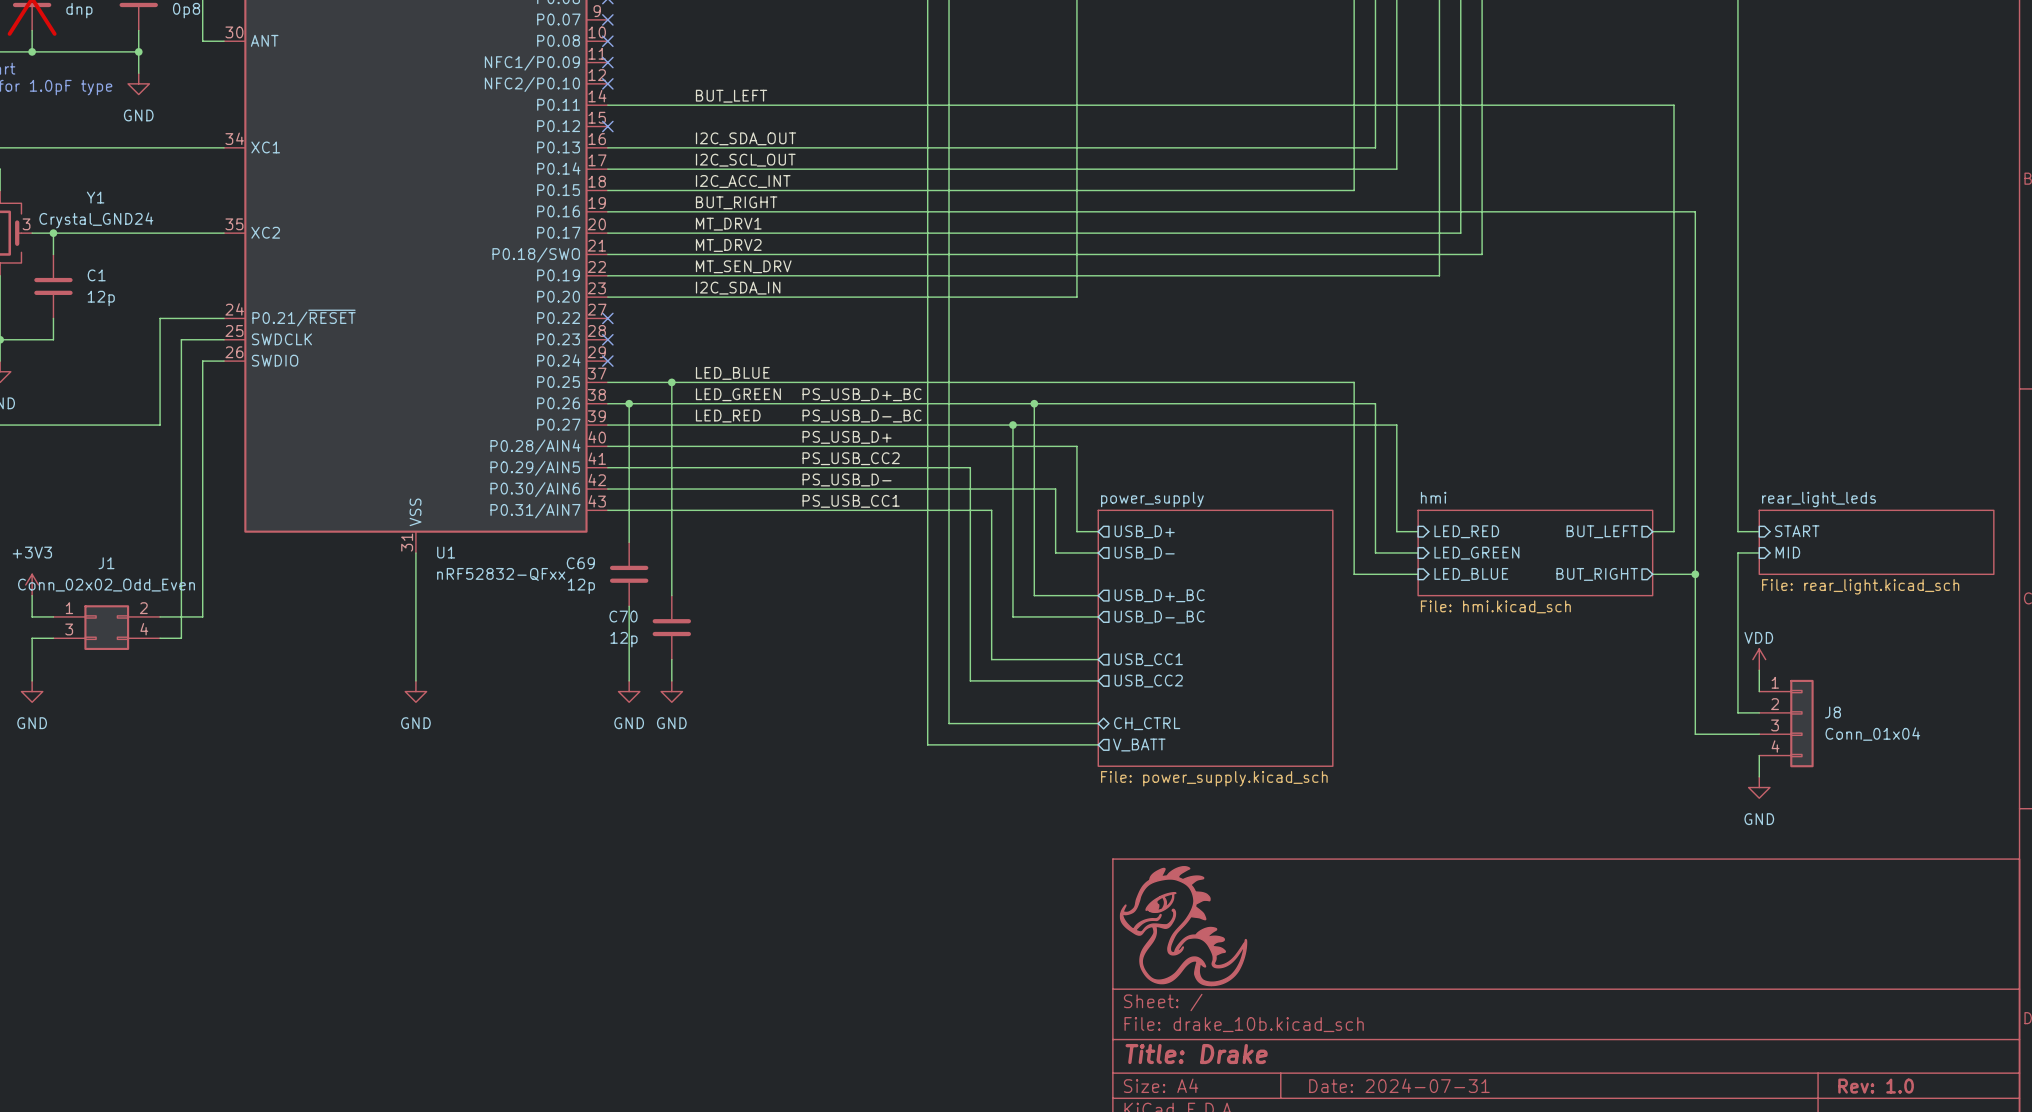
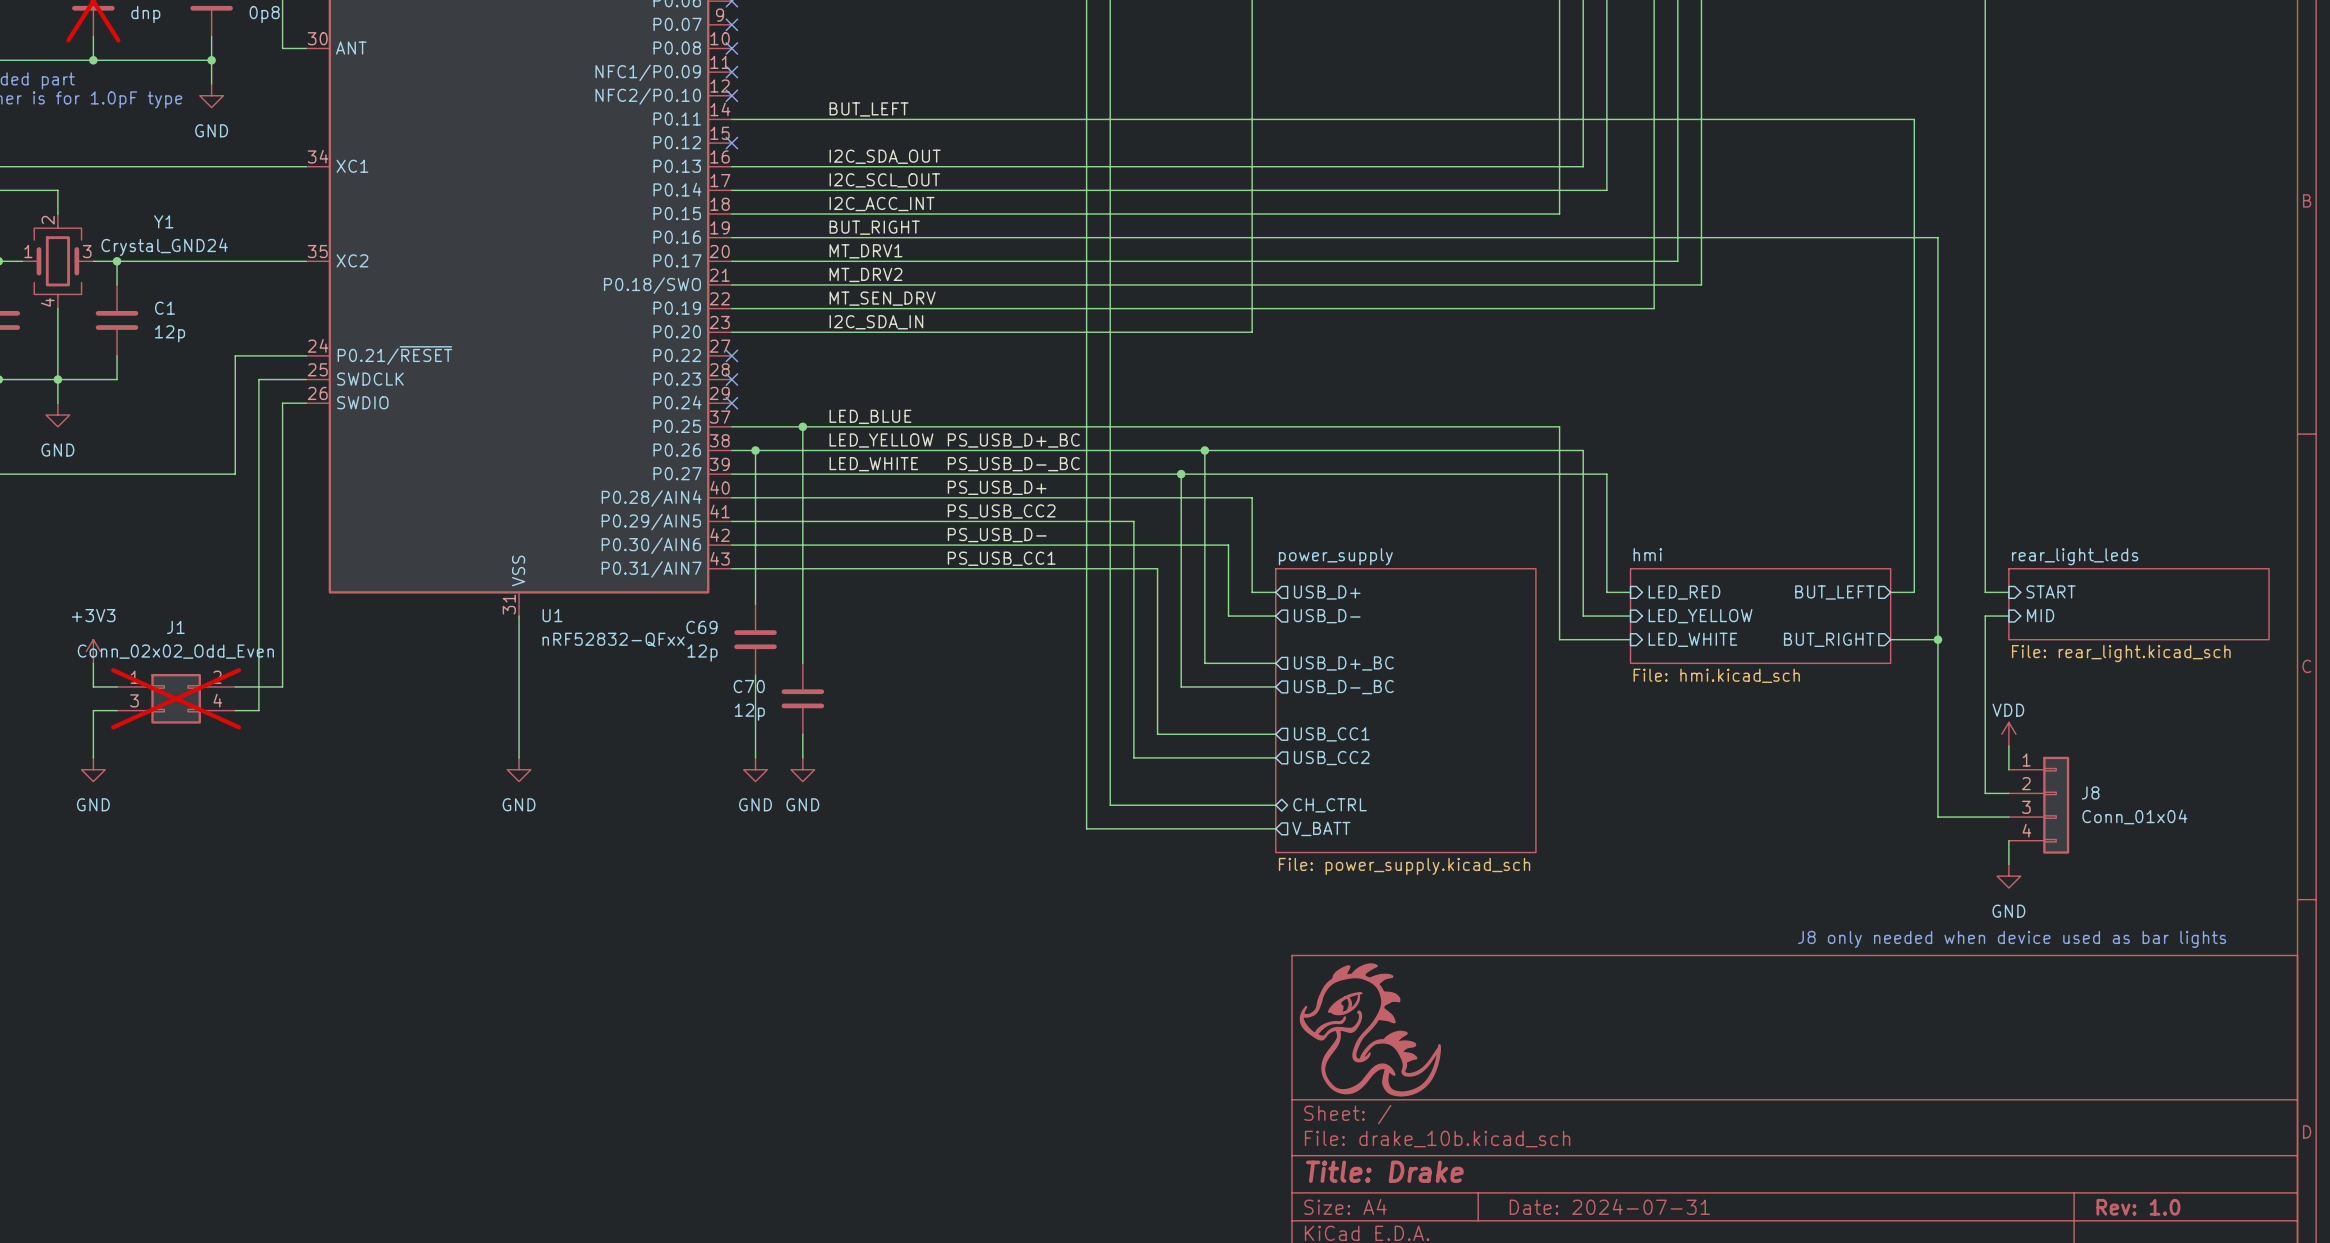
label: LED_GREEN (738, 394) -> LED_YELLOW (881, 440)
label: LED_RED (728, 416) -> LED_WHITE (873, 464)
sheet pin: LED_GREEN (1476, 553) -> LED_YELLOW (1700, 616)
sheet pin: LED_BLUE (1471, 574) -> LED_WHITE (1692, 639)
J1 do-not-place cross: none -> (176, 698)
text: none -> J8 only needed when device used as bar lights (2012, 939)

